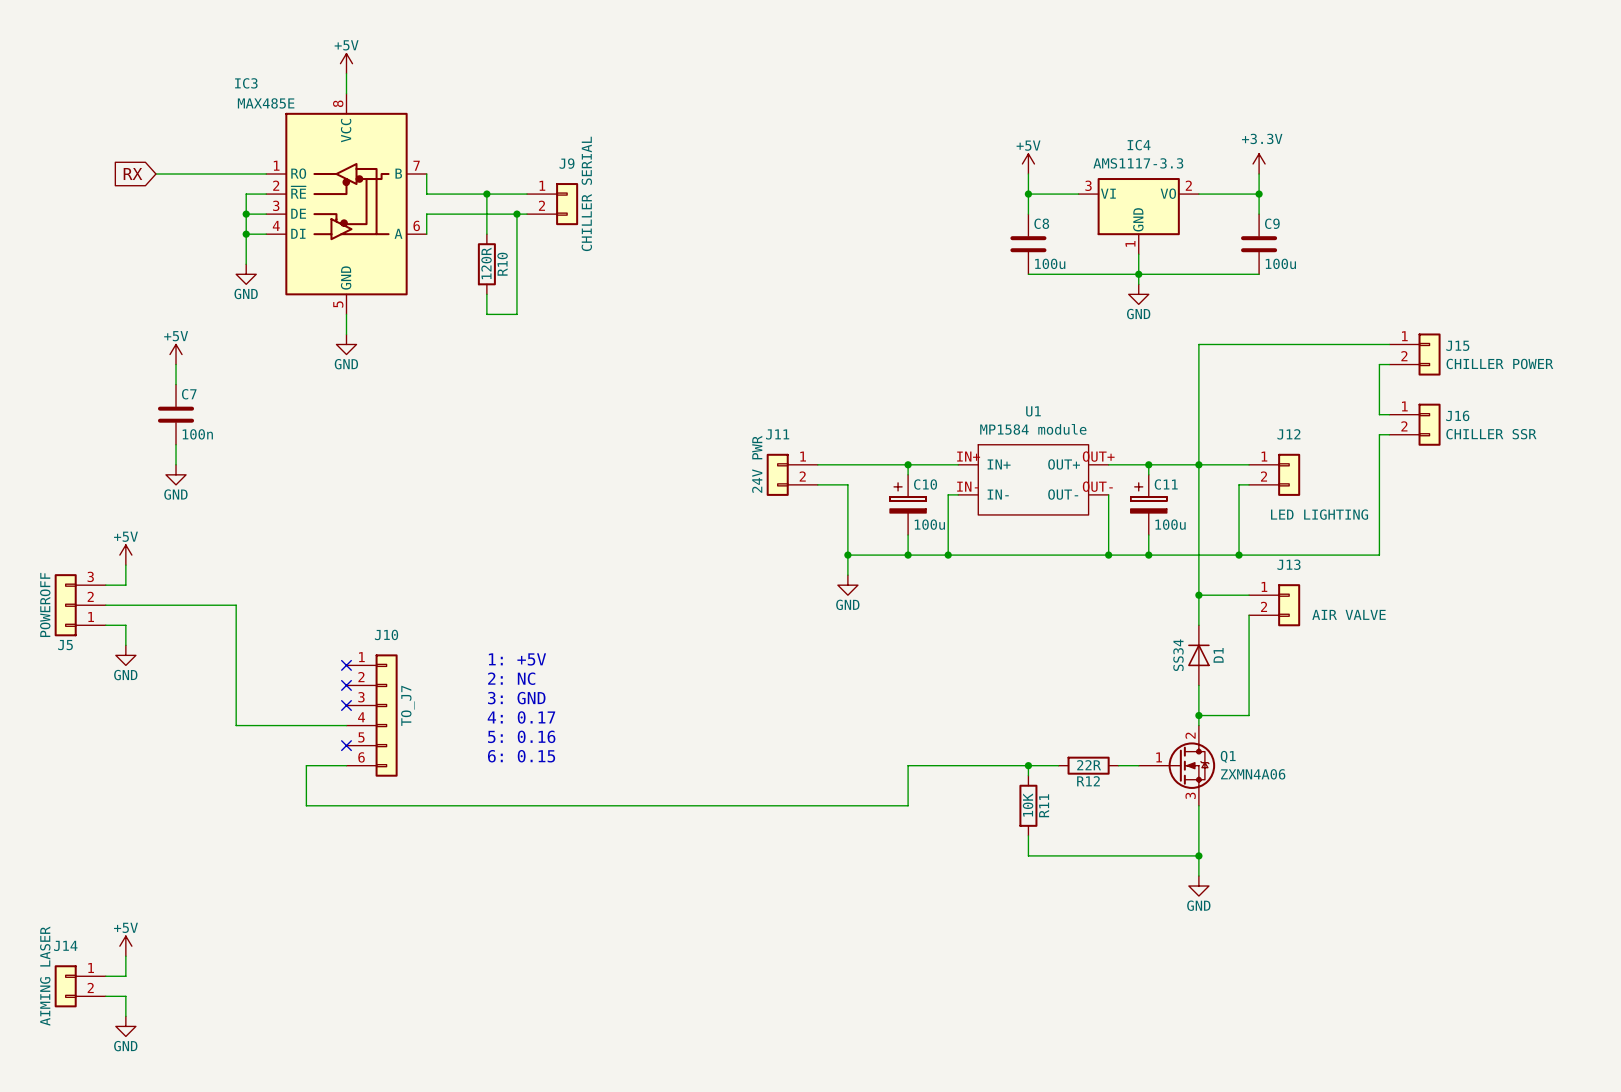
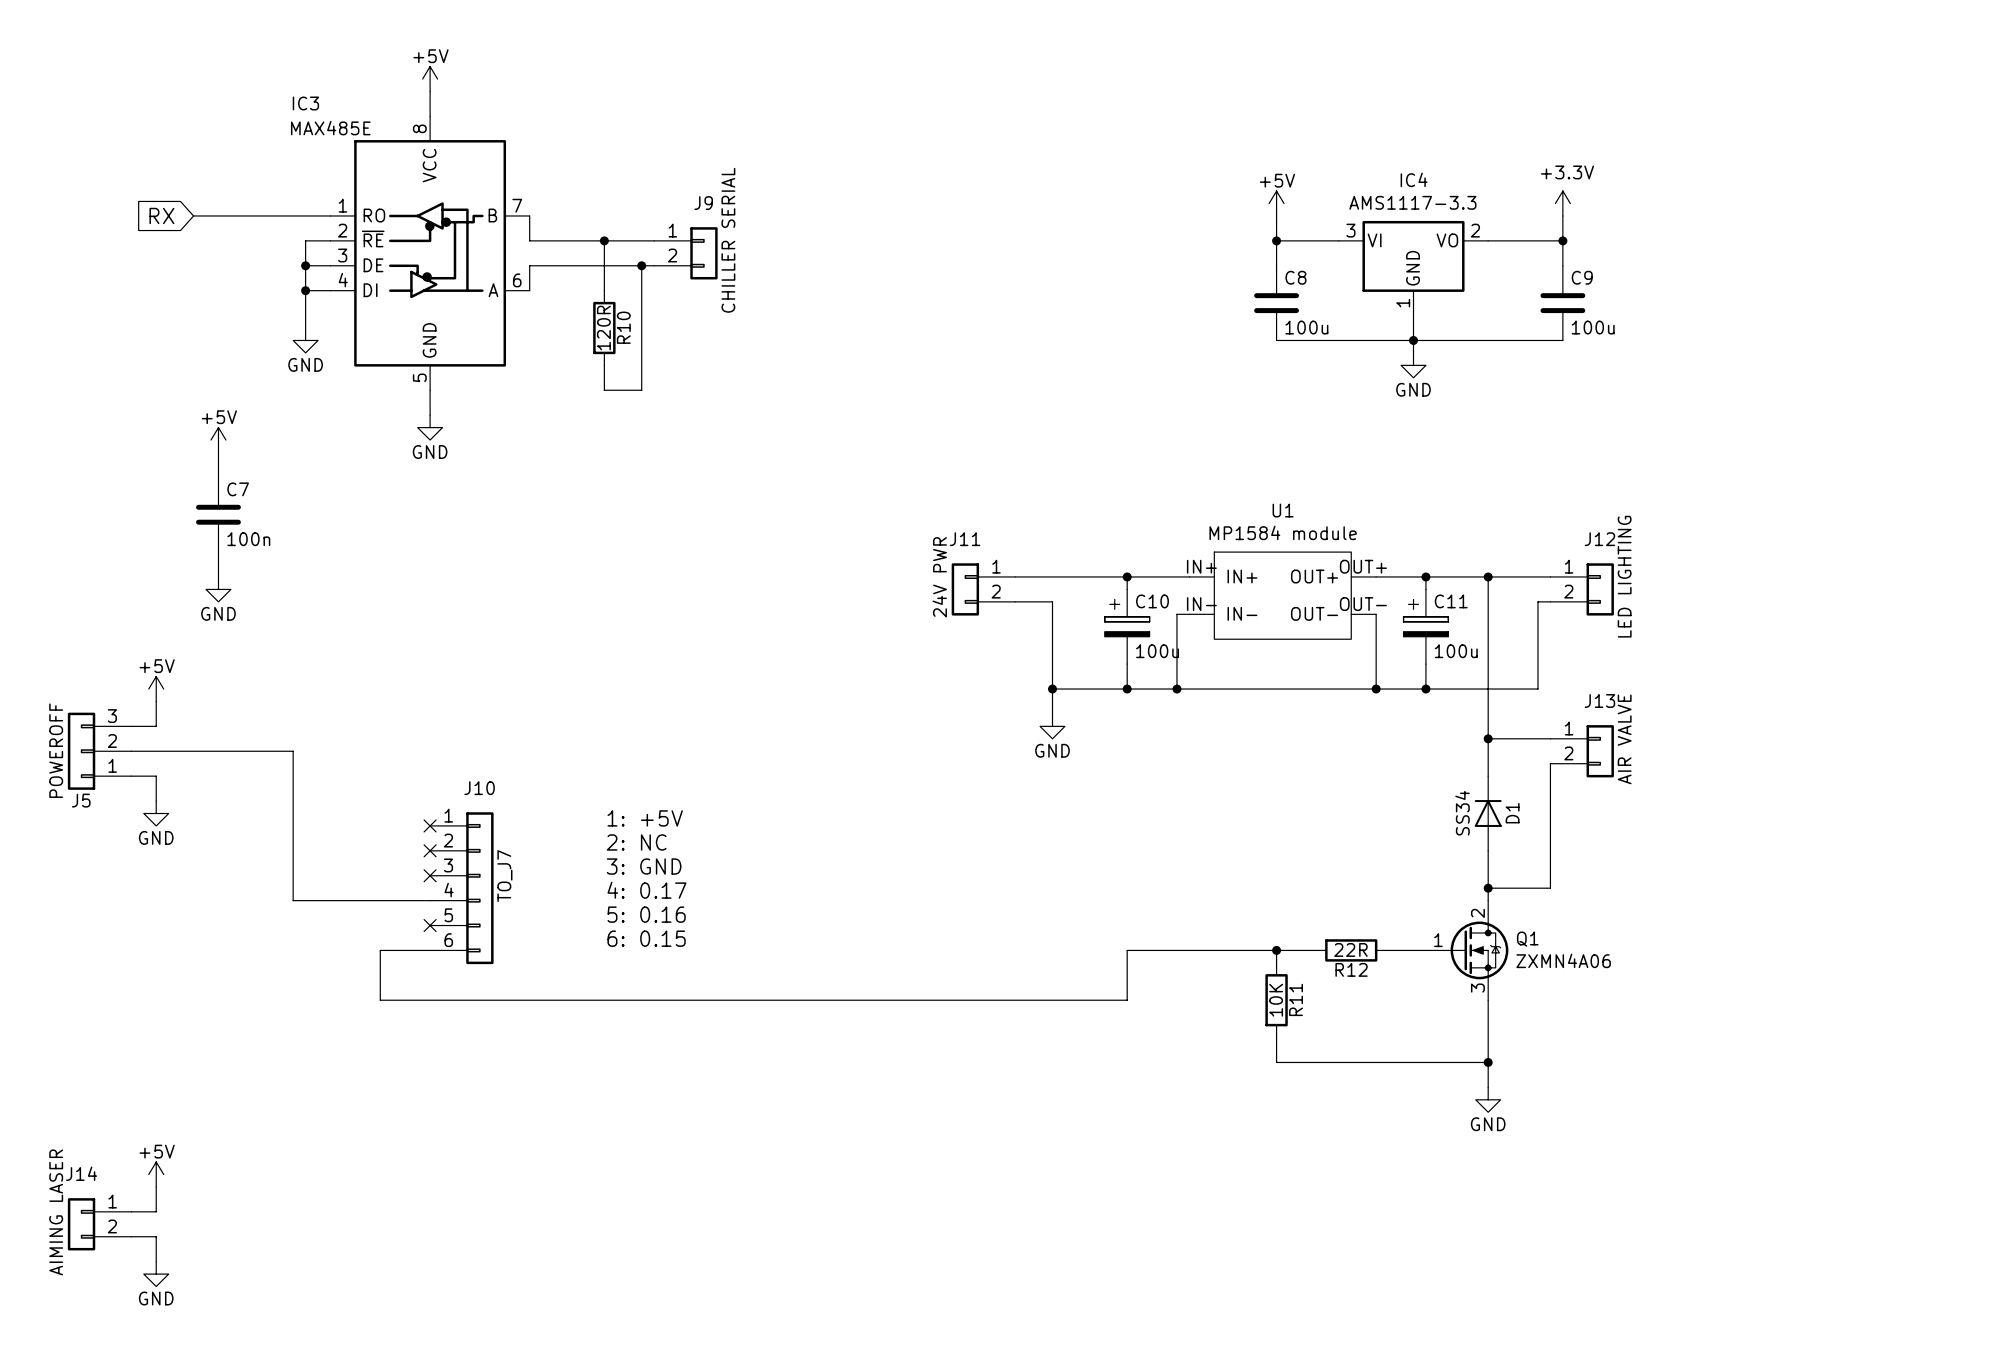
wire: (1389, 344) (1198, 344) (1198, 464) -> none
J15: CHILLER POWER (1415, 354) -> none
wire: (1389, 364) (1379, 364) (1379, 414) (1389, 414) -> none
J16: CHILLER SSR (1415, 424) -> none
wire: (1389, 434) (1379, 434) (1379, 555) (1239, 555) -> none
J12 value rotation: 0° (1319, 514) -> 90° counterclockwise (1624, 576)
junction: (1239, 555) -> none
J13 value rotation: 0° (1349, 614) -> 90° counterclockwise (1624, 739)

